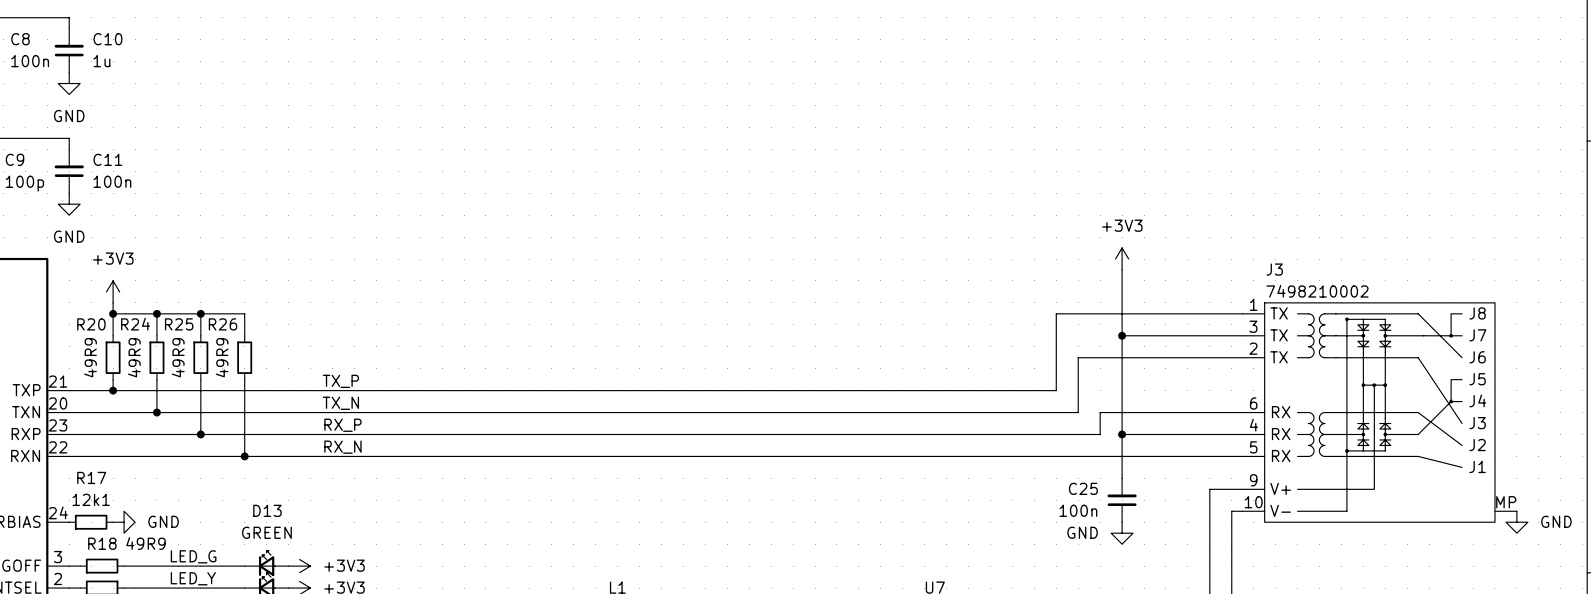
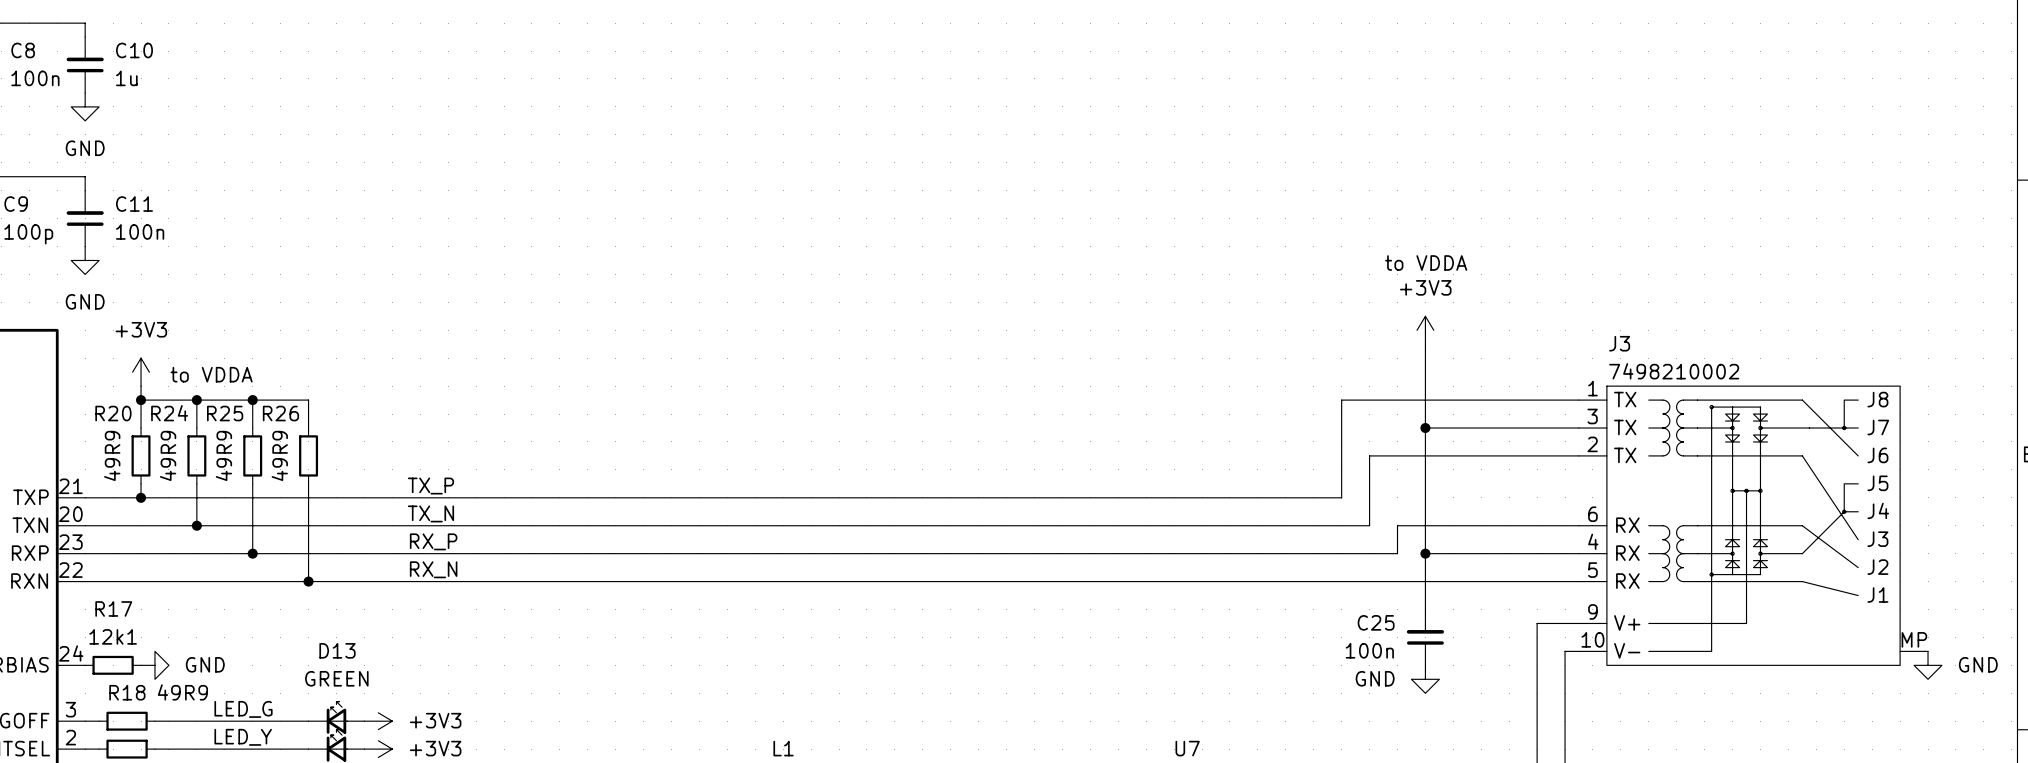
text: none -> to VDDA (1426, 263)
text: none -> to VDDA (211, 374)

